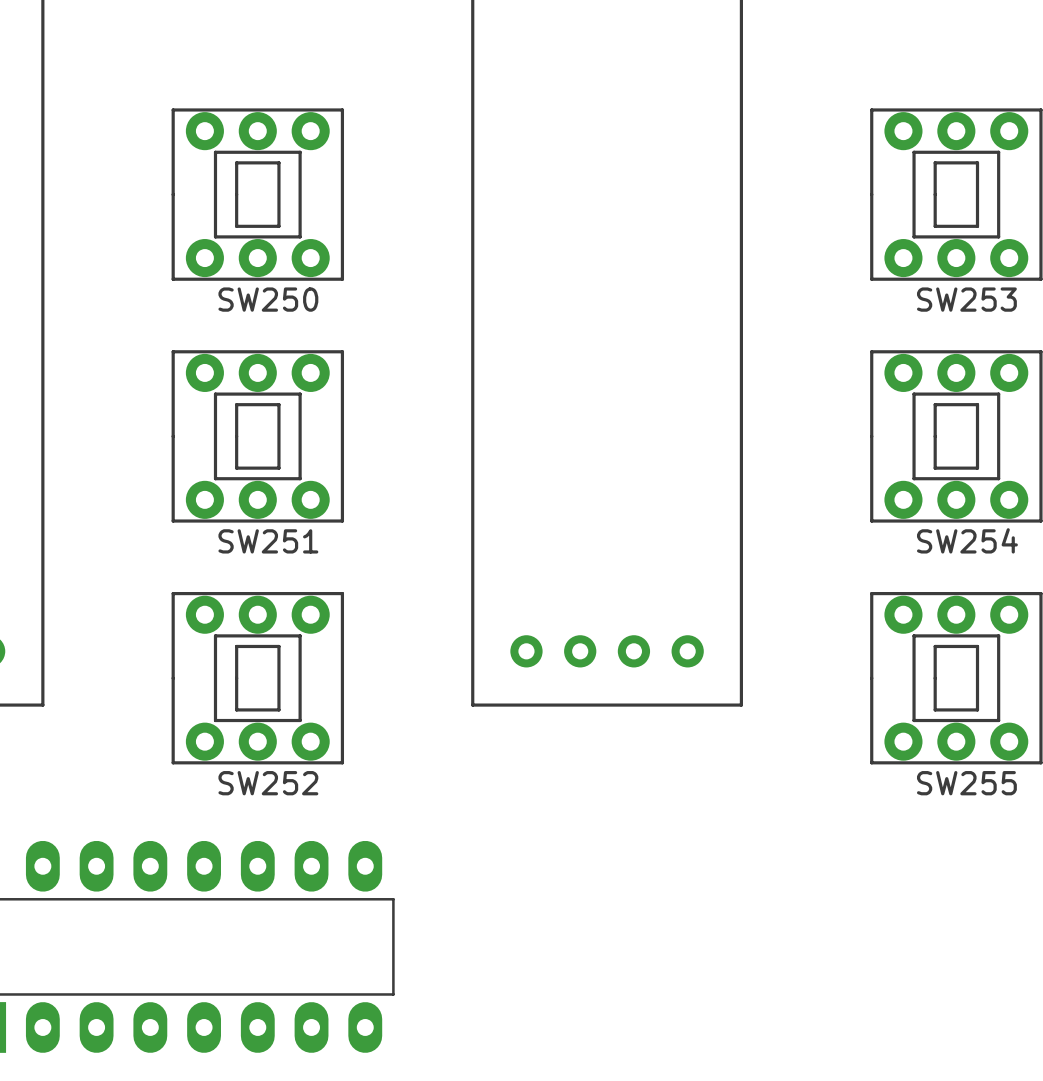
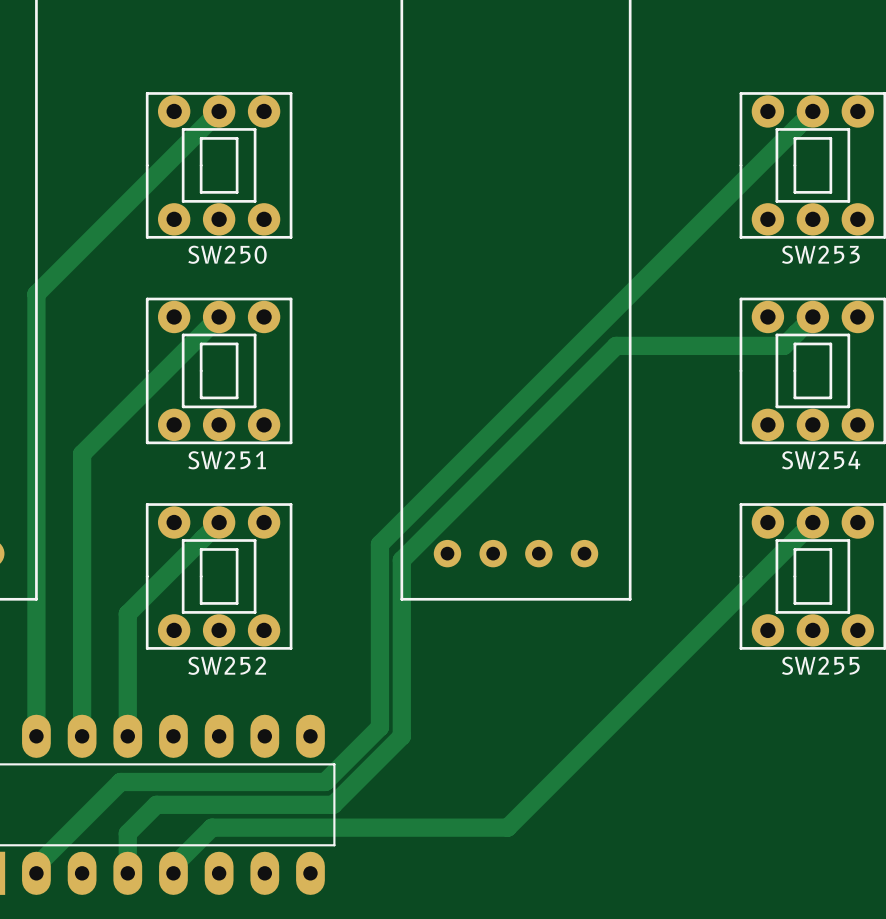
track: none -> (219, 111) (36, 294) (36, 736)
track: none -> (812, 111) (379, 544) (379, 727) (325, 781) (120, 781) (36, 866) (36, 873)
track: none -> (219, 316) (82, 454) (82, 736)
track: none -> (812, 316) (783, 345) (616, 345) (401, 560) (401, 736) (333, 804) (156, 804) (127, 833) (127, 873)
track: none -> (219, 522) (127, 613) (127, 736)
track: none -> (812, 522) (507, 827) (211, 827) (173, 866) (173, 873)

